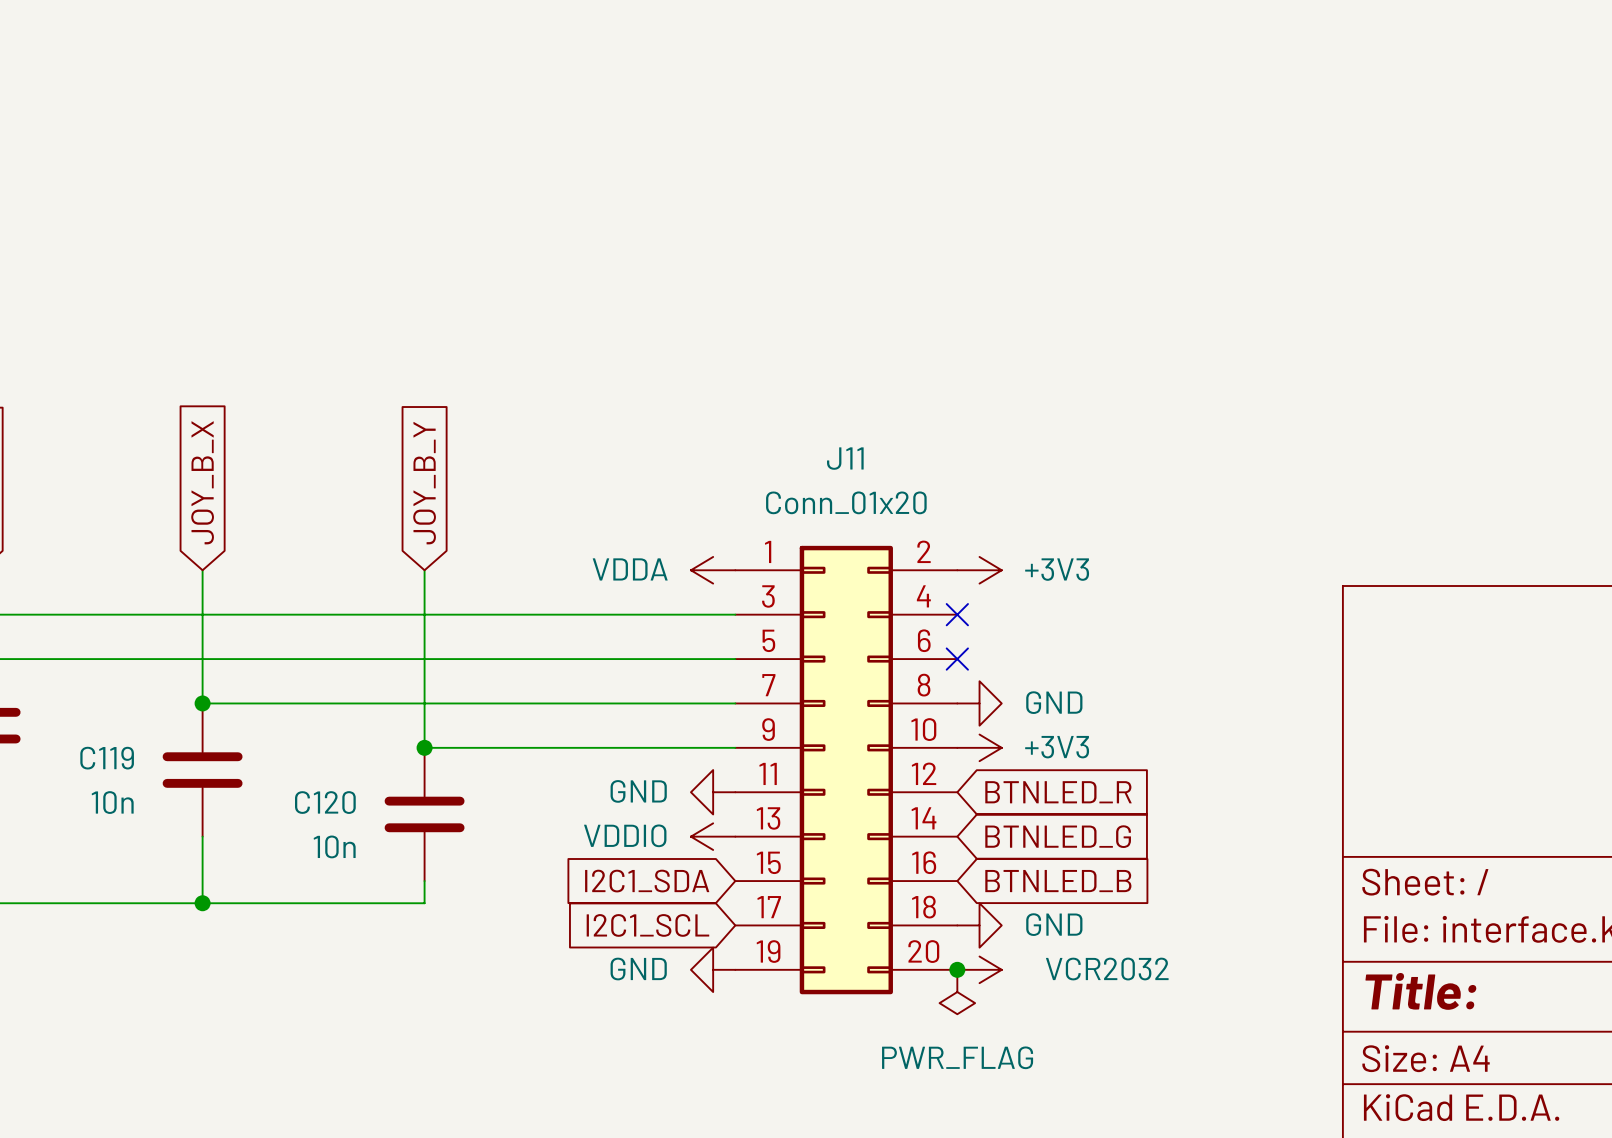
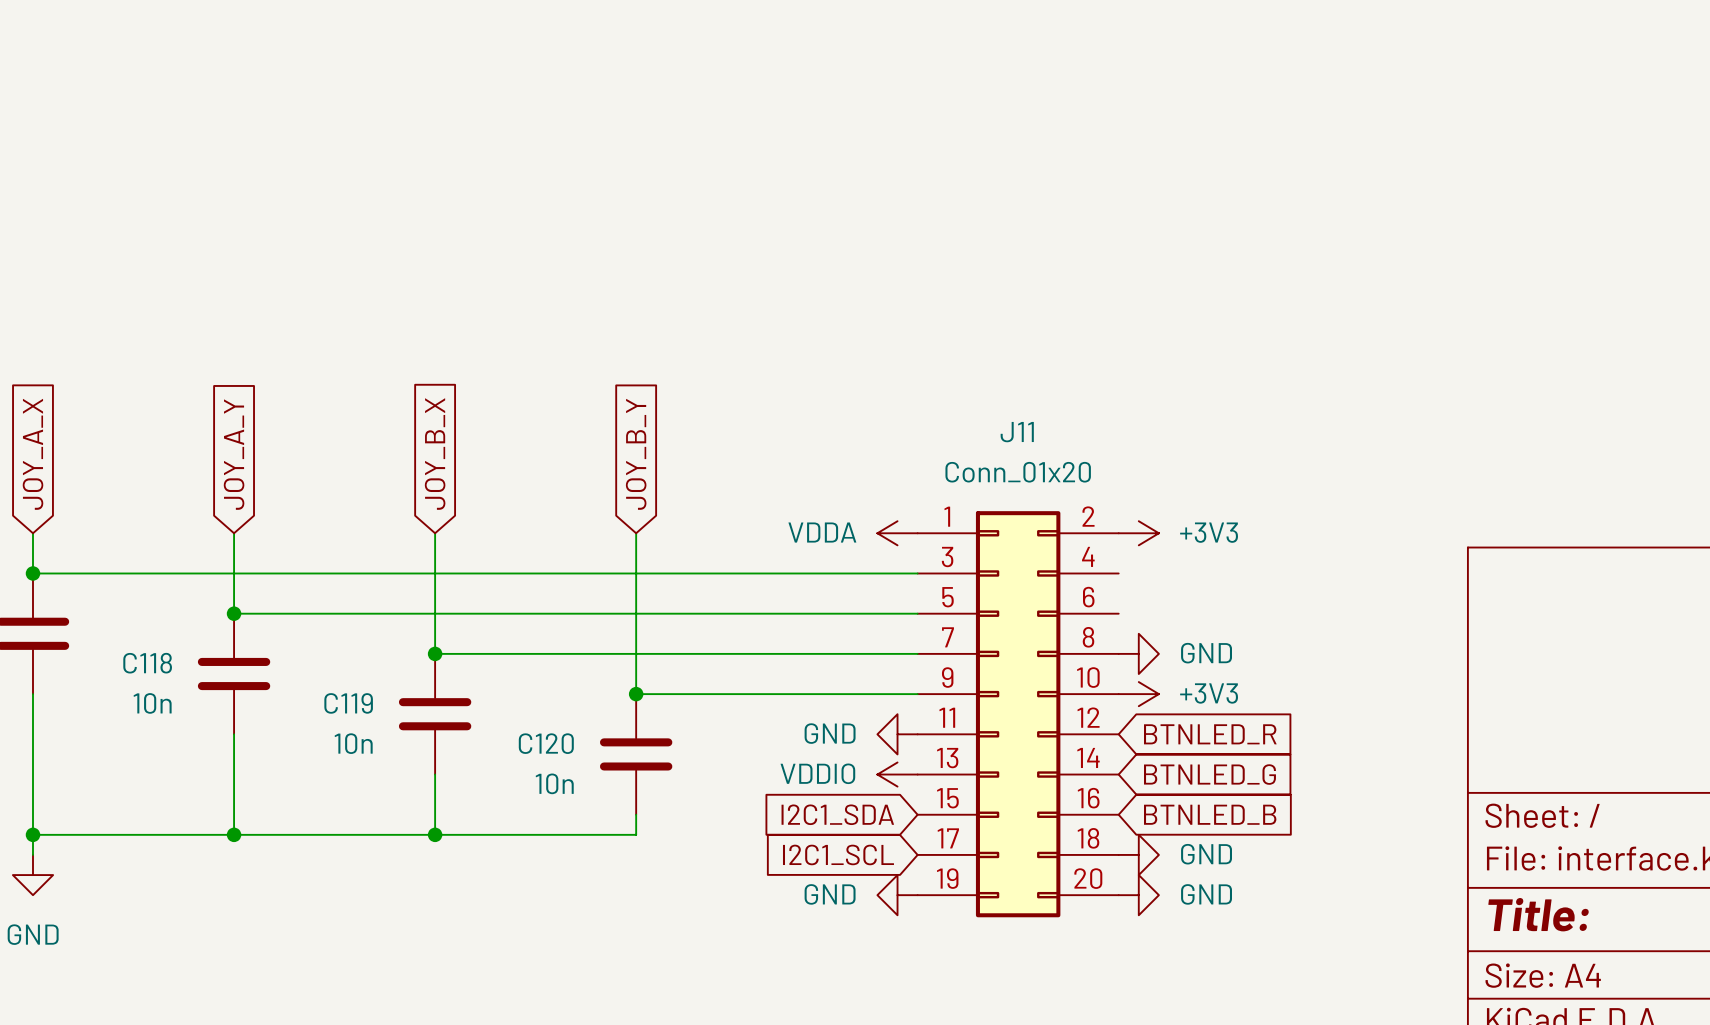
no-connect mark: (957, 614) -> none
no-connect mark: (957, 659) -> none
junction: (957, 969) -> none
power symbol: VCR2032 (979, 969) -> GND (1138, 895)
power symbol: PWR_FLAG (957, 992) -> none

